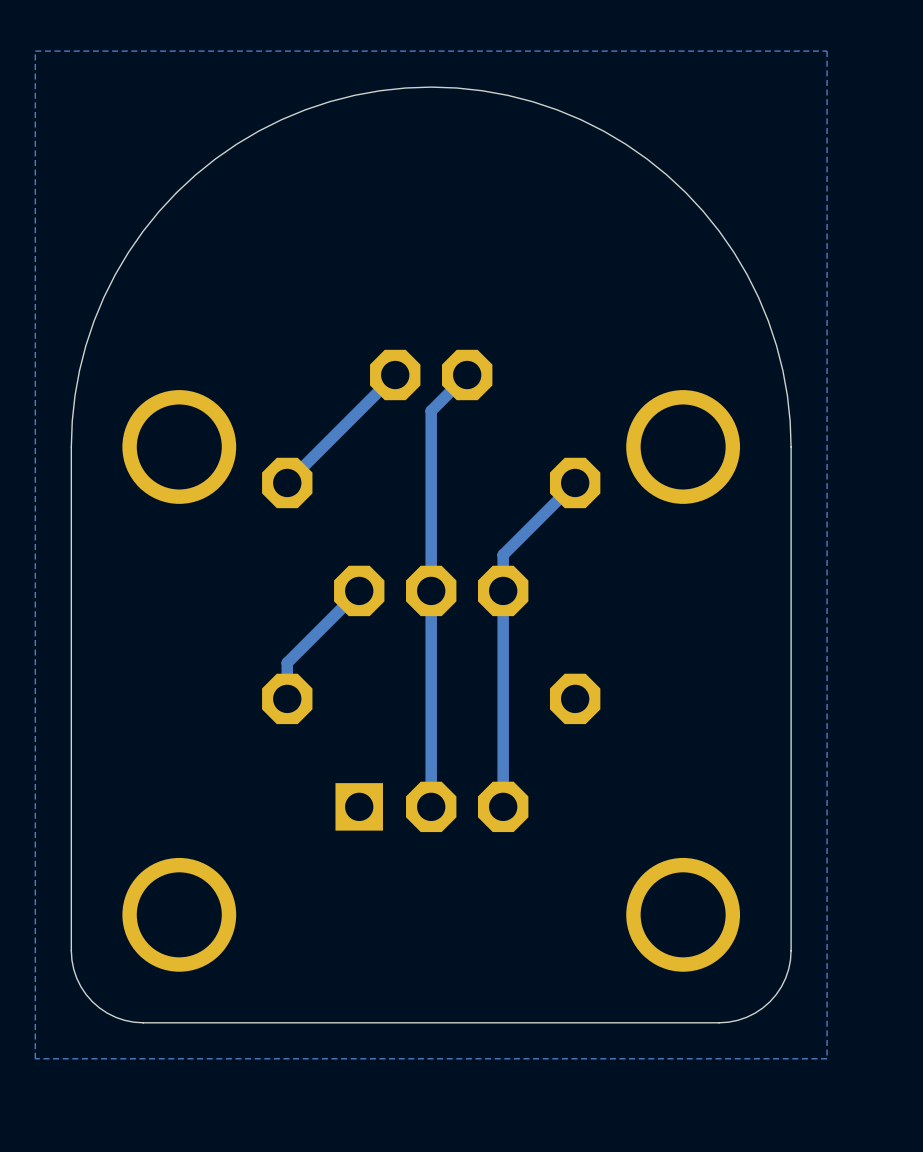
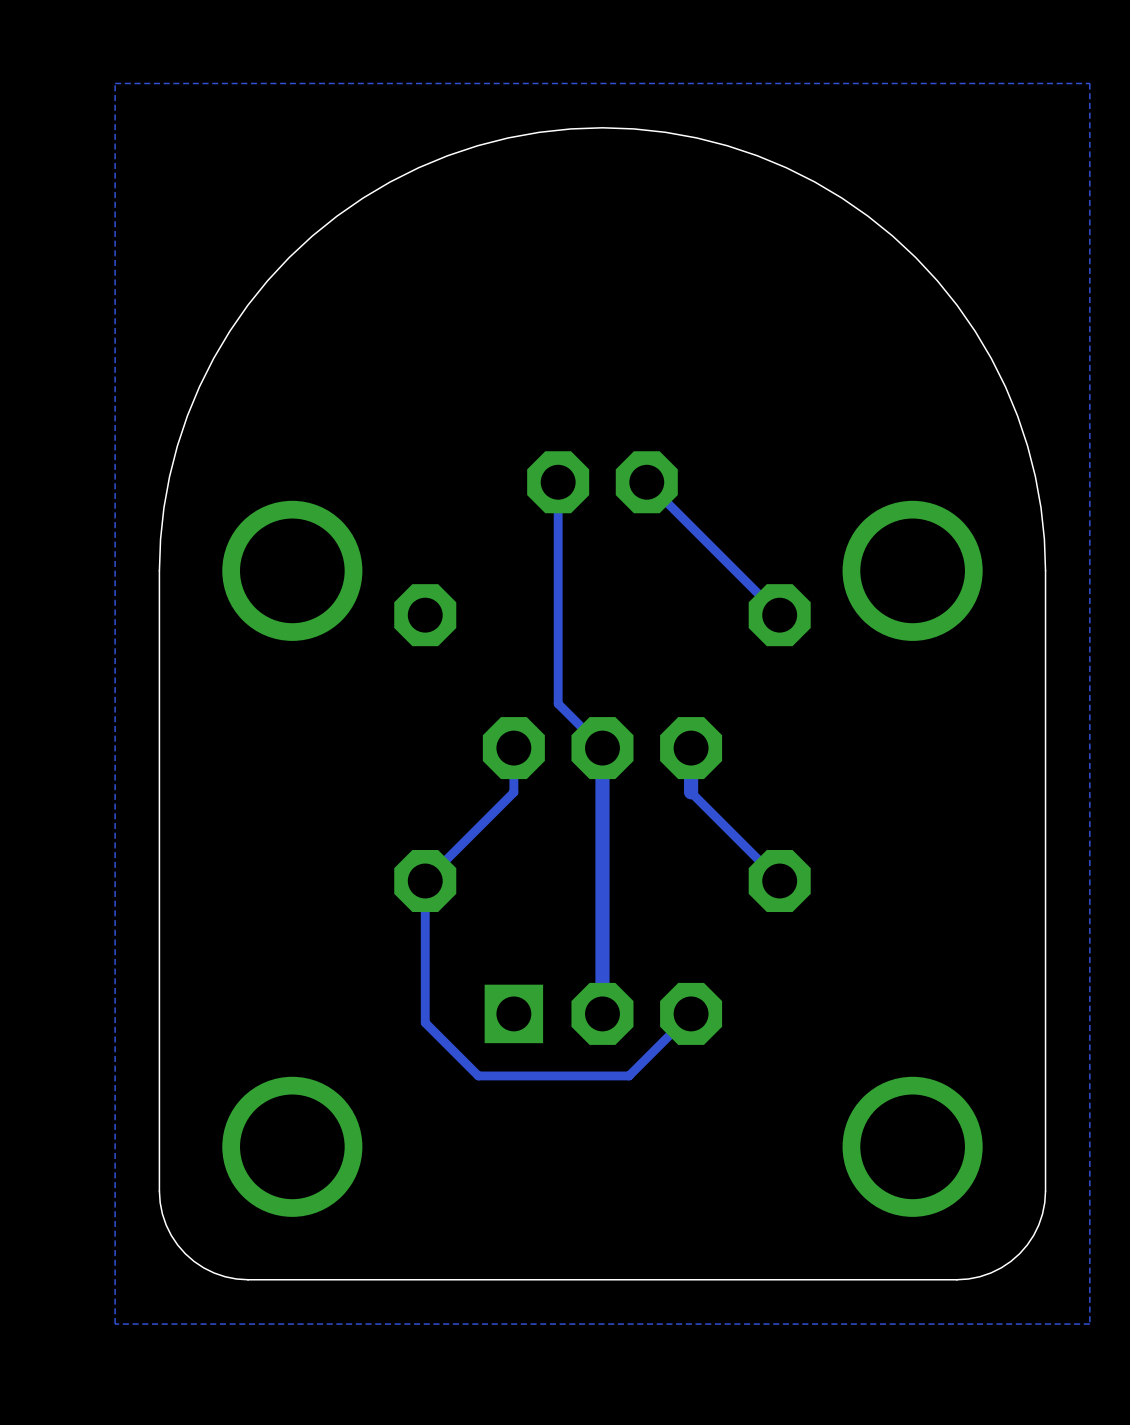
track: (395, 375) (287, 482) -> none
track: (467, 375) (431, 410) (431, 590) -> (558, 482) (558, 703) (602, 748)
track: (575, 482) (503, 554) (503, 590) -> (779, 615) (646, 482)
track: (359, 590) (287, 662) (287, 698) -> (513, 748) (513, 792) (425, 881) (425, 1022) (478, 1075) (629, 1075) (691, 1013)
track: (503, 626) (503, 806) -> (691, 792) (779, 881)

